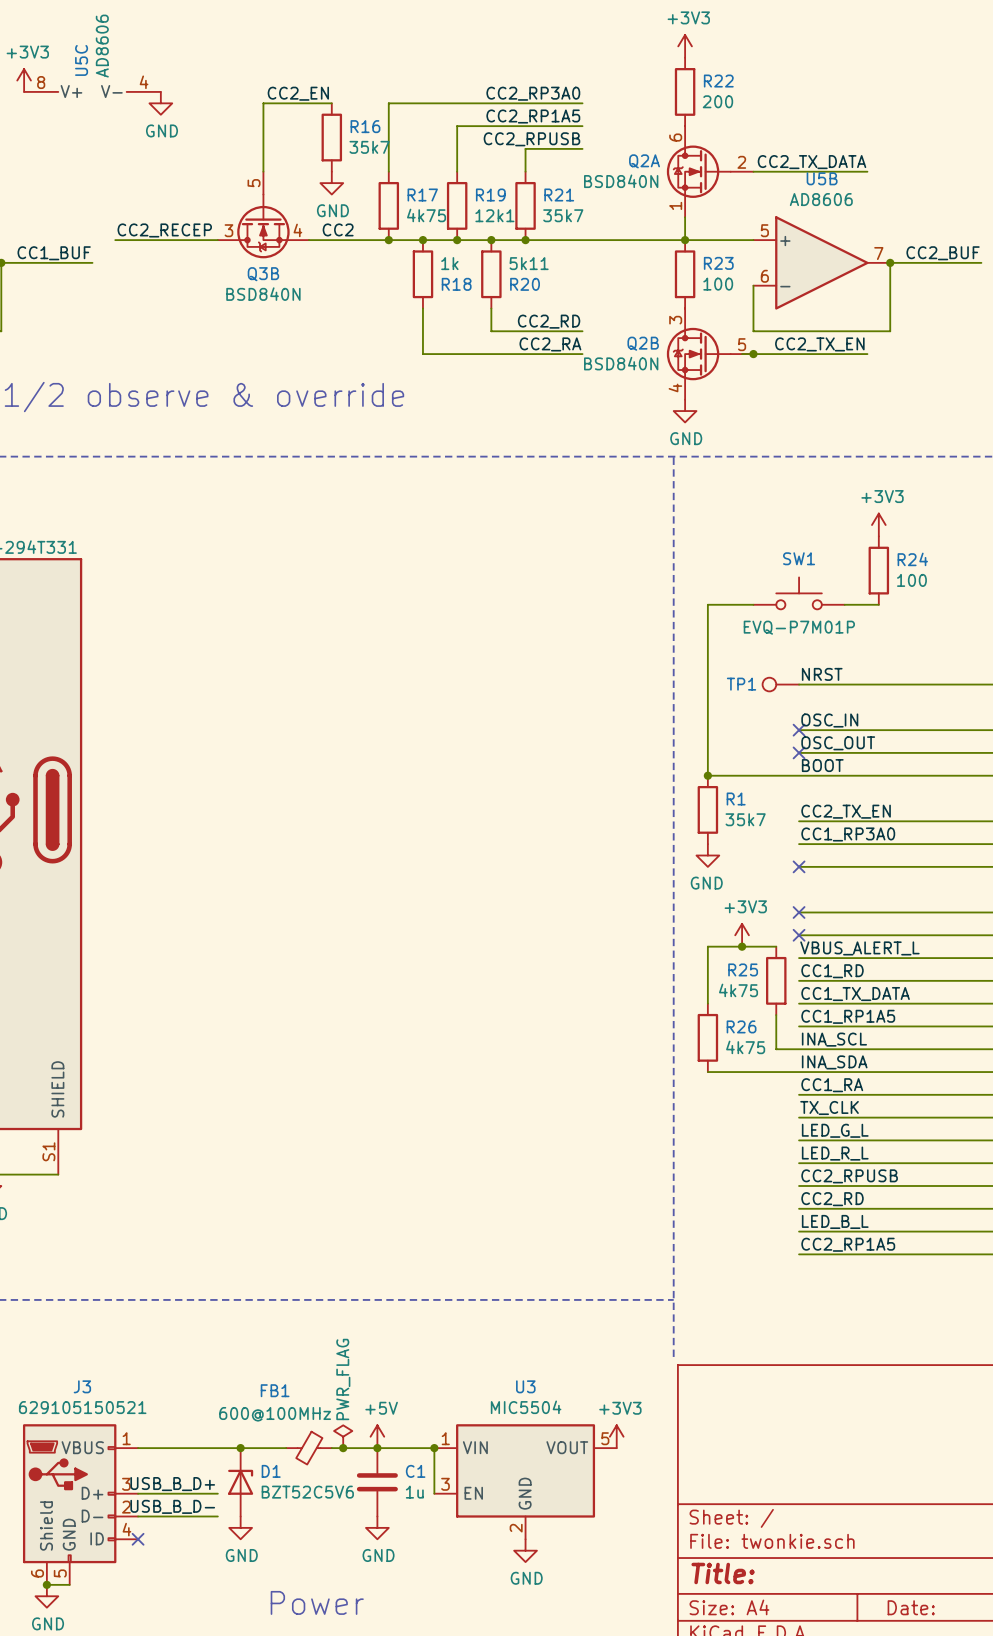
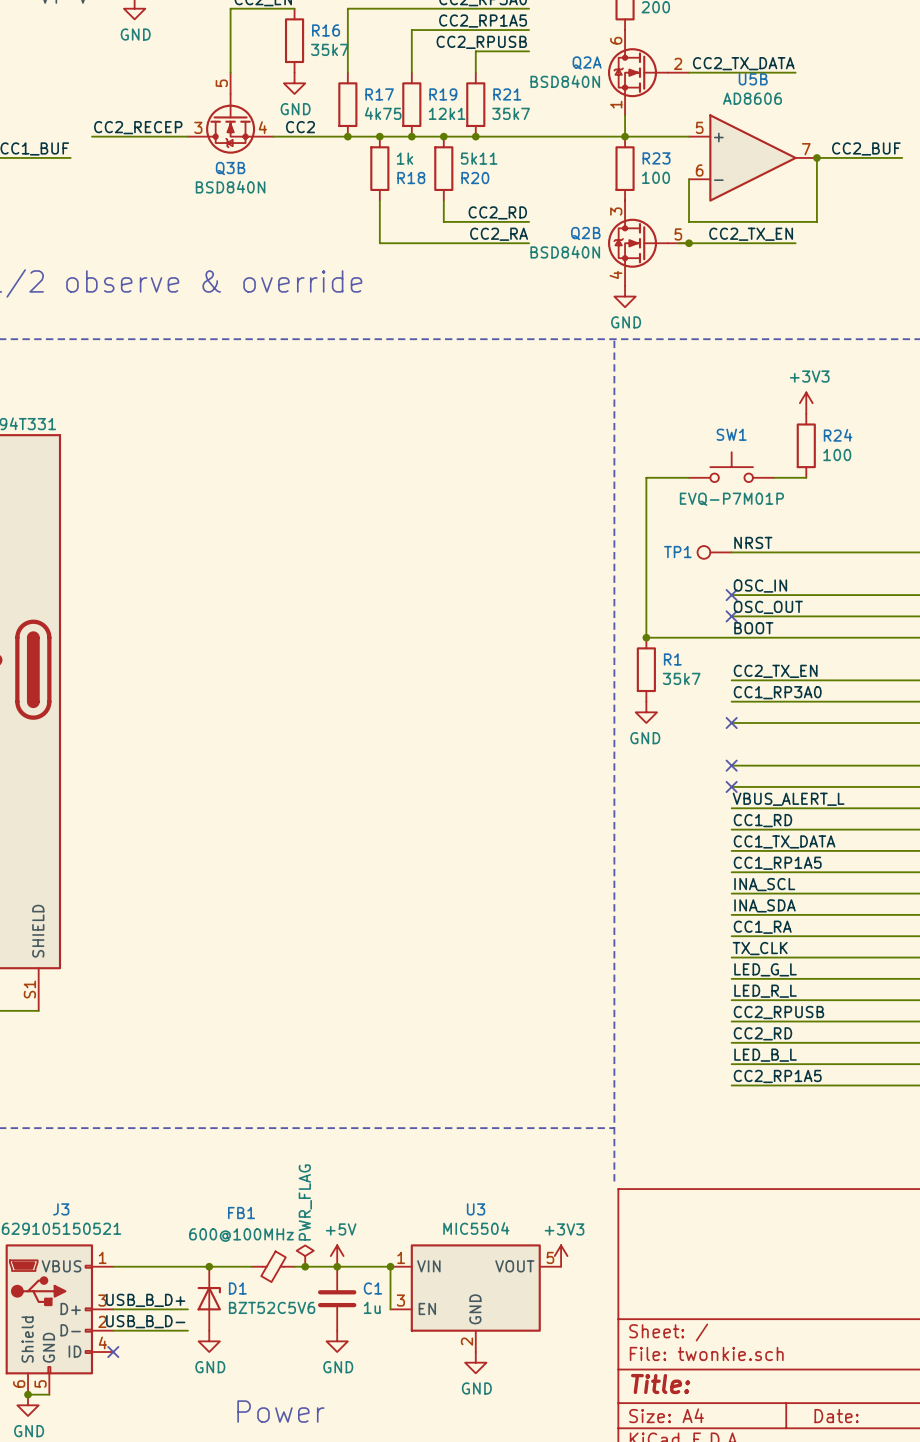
power symbol: +3V3 (742, 935) -> none
junction: (742, 946) -> none
wire: (776, 946) (707, 946) (707, 1003) -> none
R25: 4k75 (776, 980) -> none
wire: (776, 1015) (776, 1049) (799, 1049) -> none
R26: 4k75 (707, 1037) -> none
wire: (707, 1072) (799, 1072) -> none

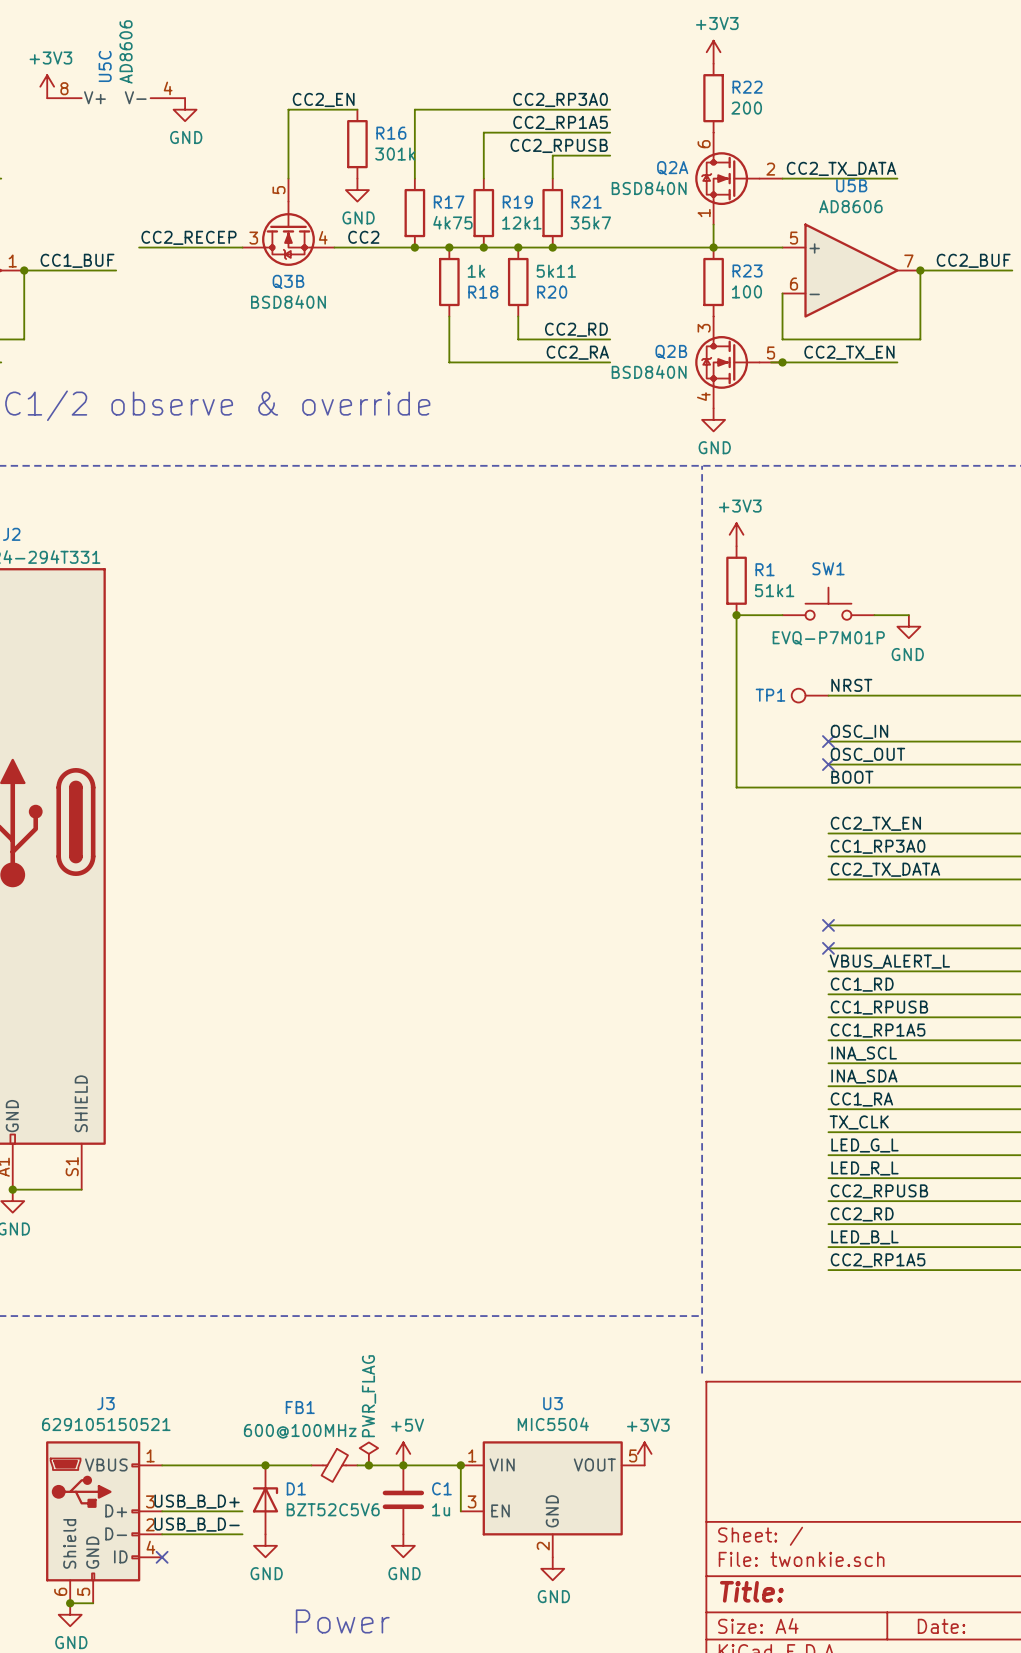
R16 value: 35k7 (329, 49) -> 301k (395, 154)
power symbol position: +3V3 (806, 403) -> +3V3 (736, 534)
R24: 100 (806, 445) -> none
junction: none -> (736, 615)
power symbol: none -> GND (908, 626)
junction: (646, 637) -> none
R1 position: (646, 669) -> (736, 580)
R1 value: 35k7 (681, 678) -> 51k1 (774, 590)
power symbol: GND (646, 712) -> none
label: none -> CC2_TX_DATA (885, 869)
no-connect mark: (731, 723) -> none
label: CC1_TX_DATA (784, 841) -> CC1_RPUSB (879, 1007)

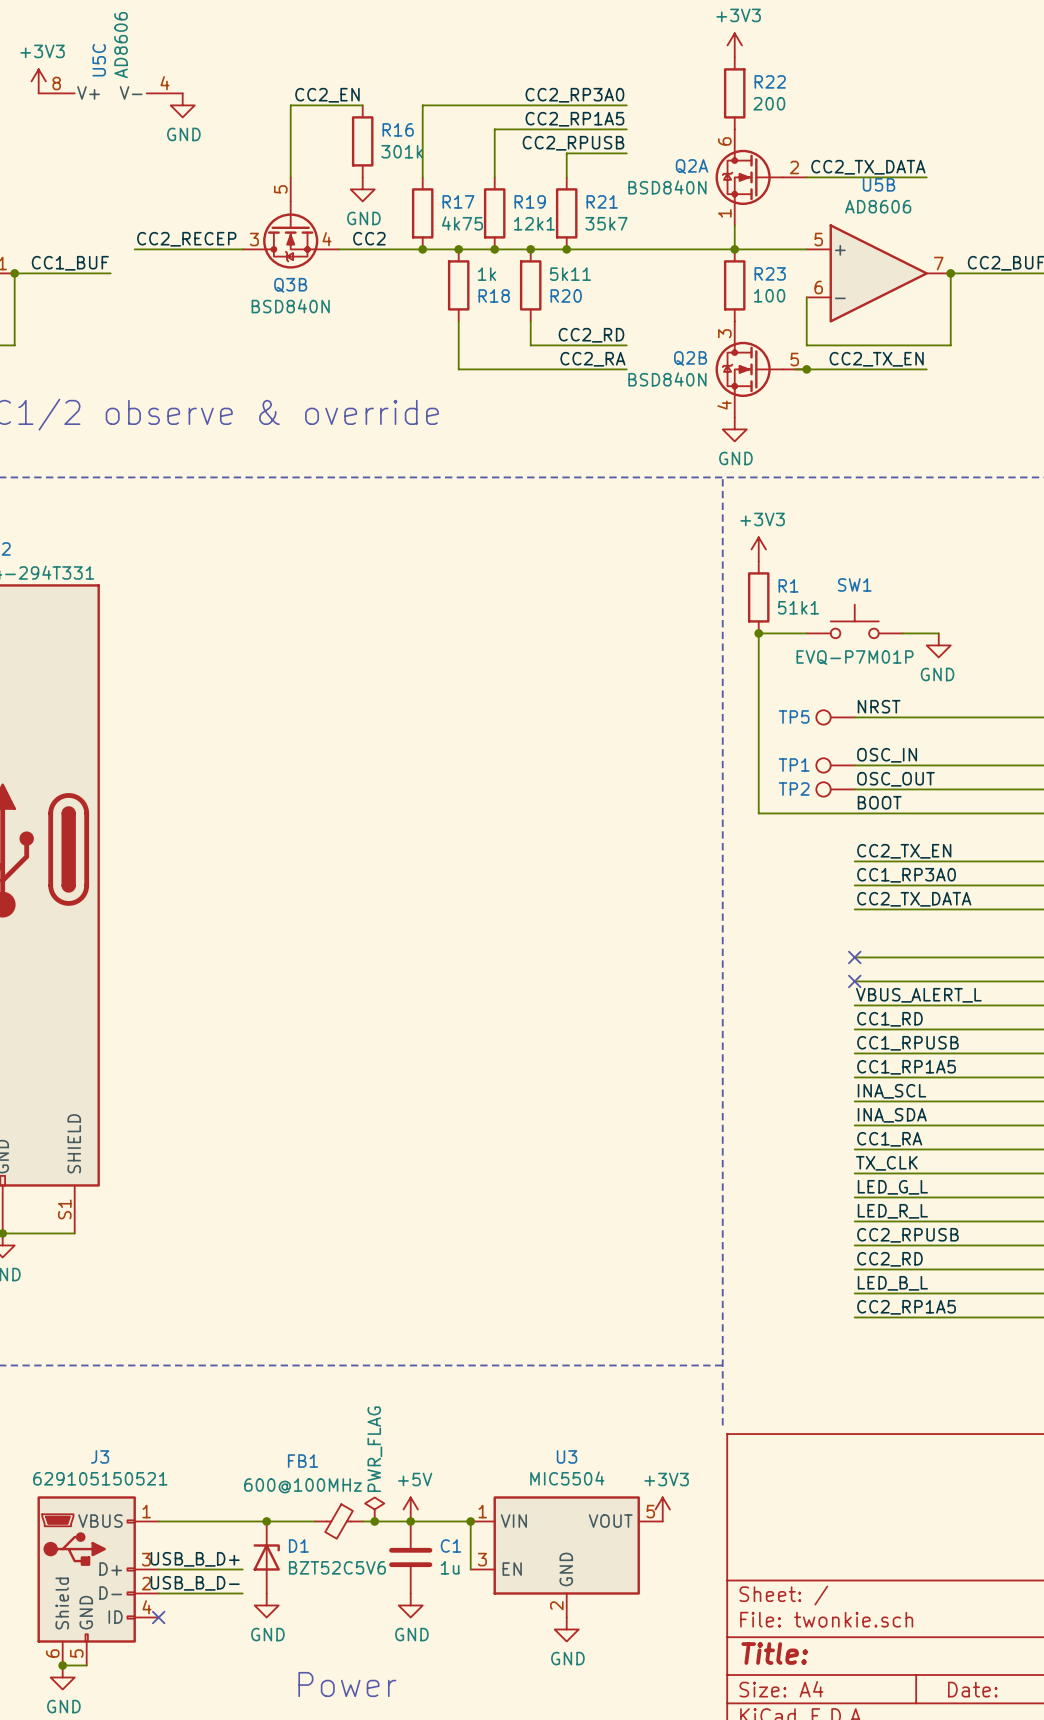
TP1 name: TP1 (770, 695) -> TP5 (794, 716)
TP1: none -> (835, 765)
no-connect mark: (828, 741) -> none
TP2: none -> (835, 789)
no-connect mark: (828, 764) -> none

